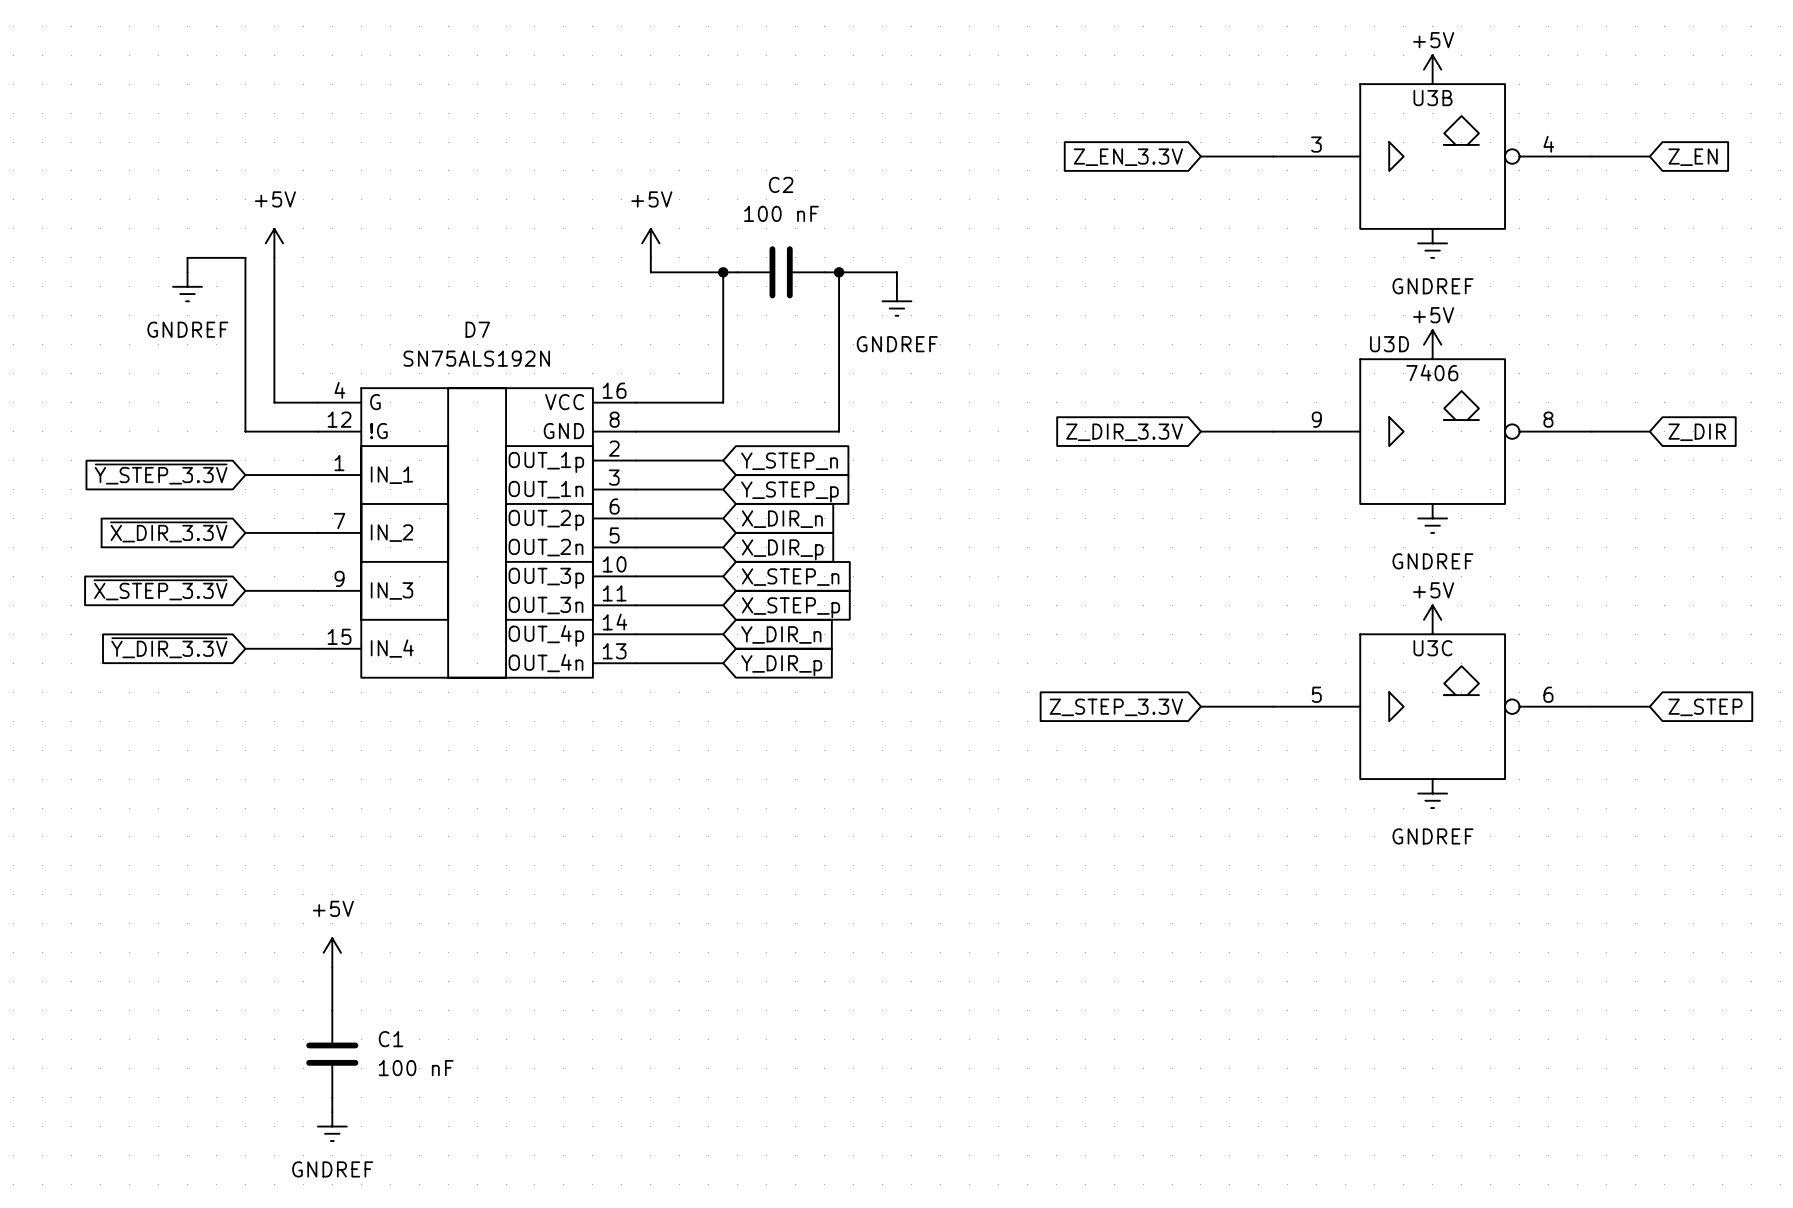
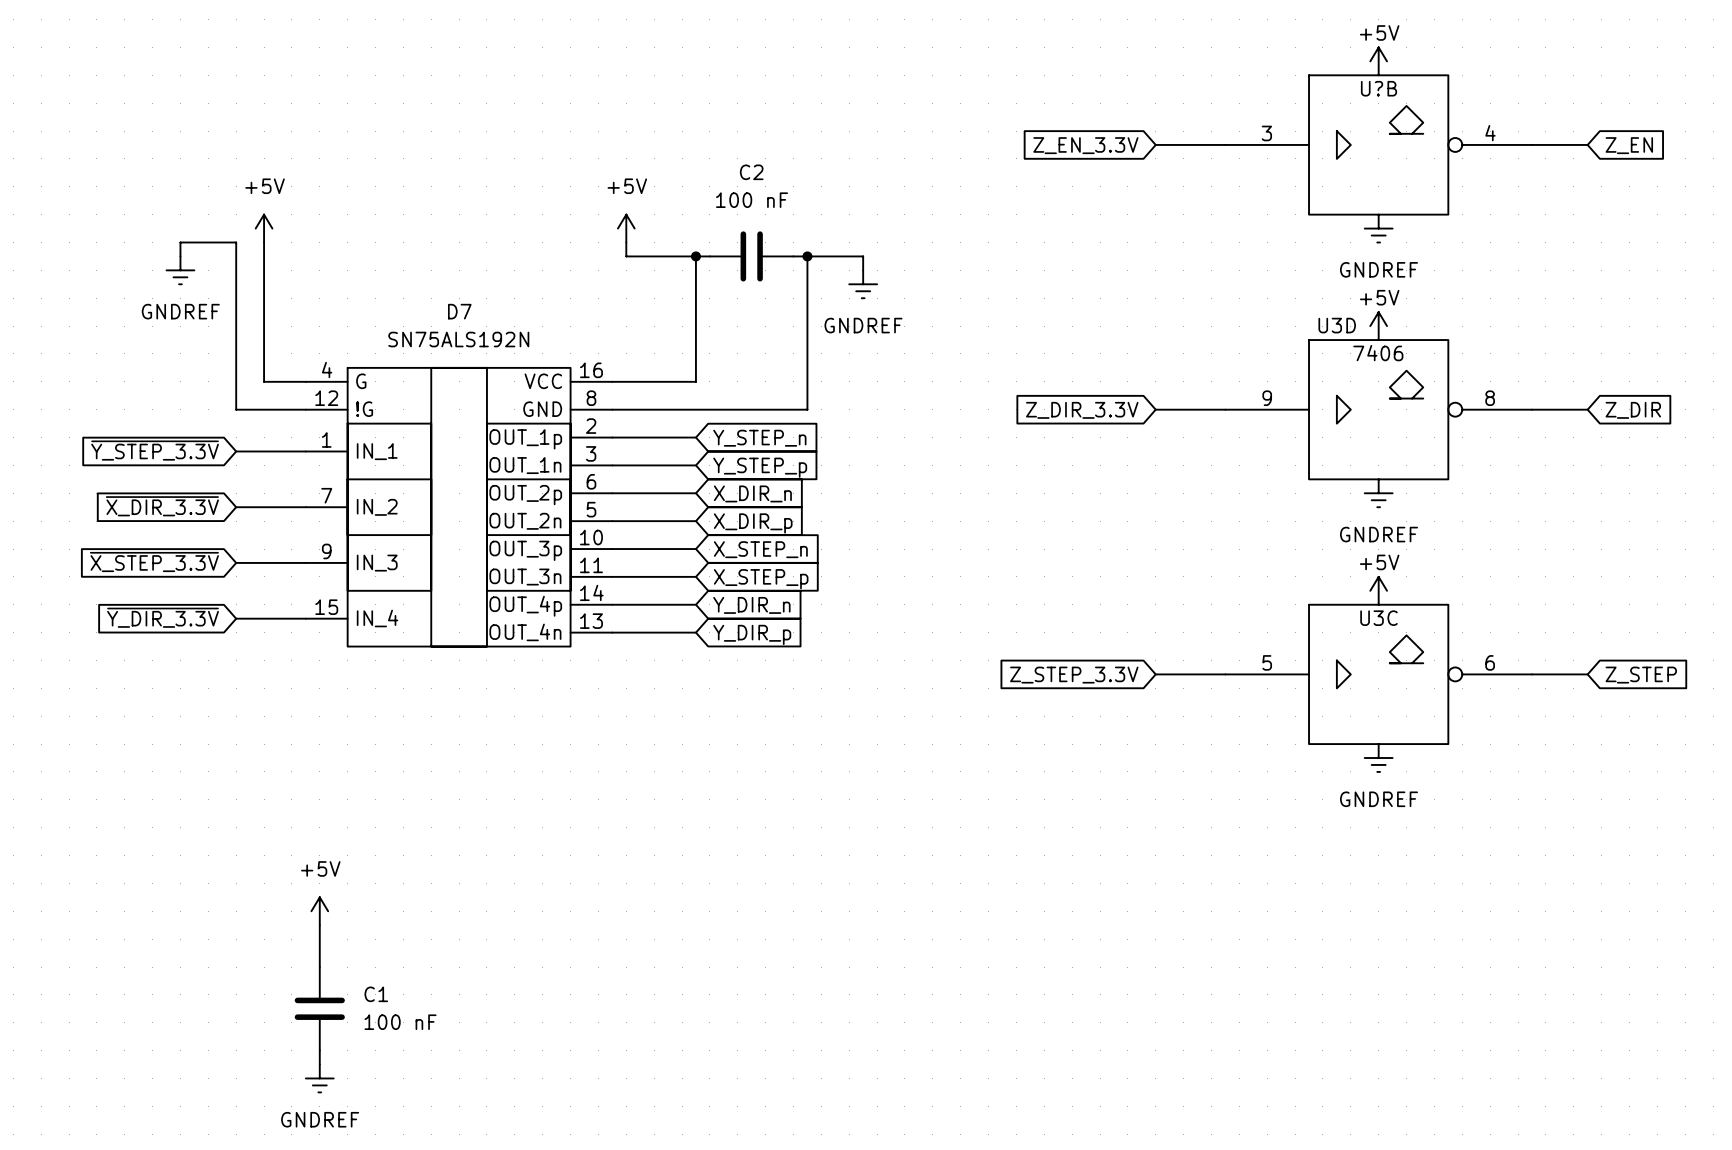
U3B name: U3B (1432, 98) -> U?B (1379, 88)

